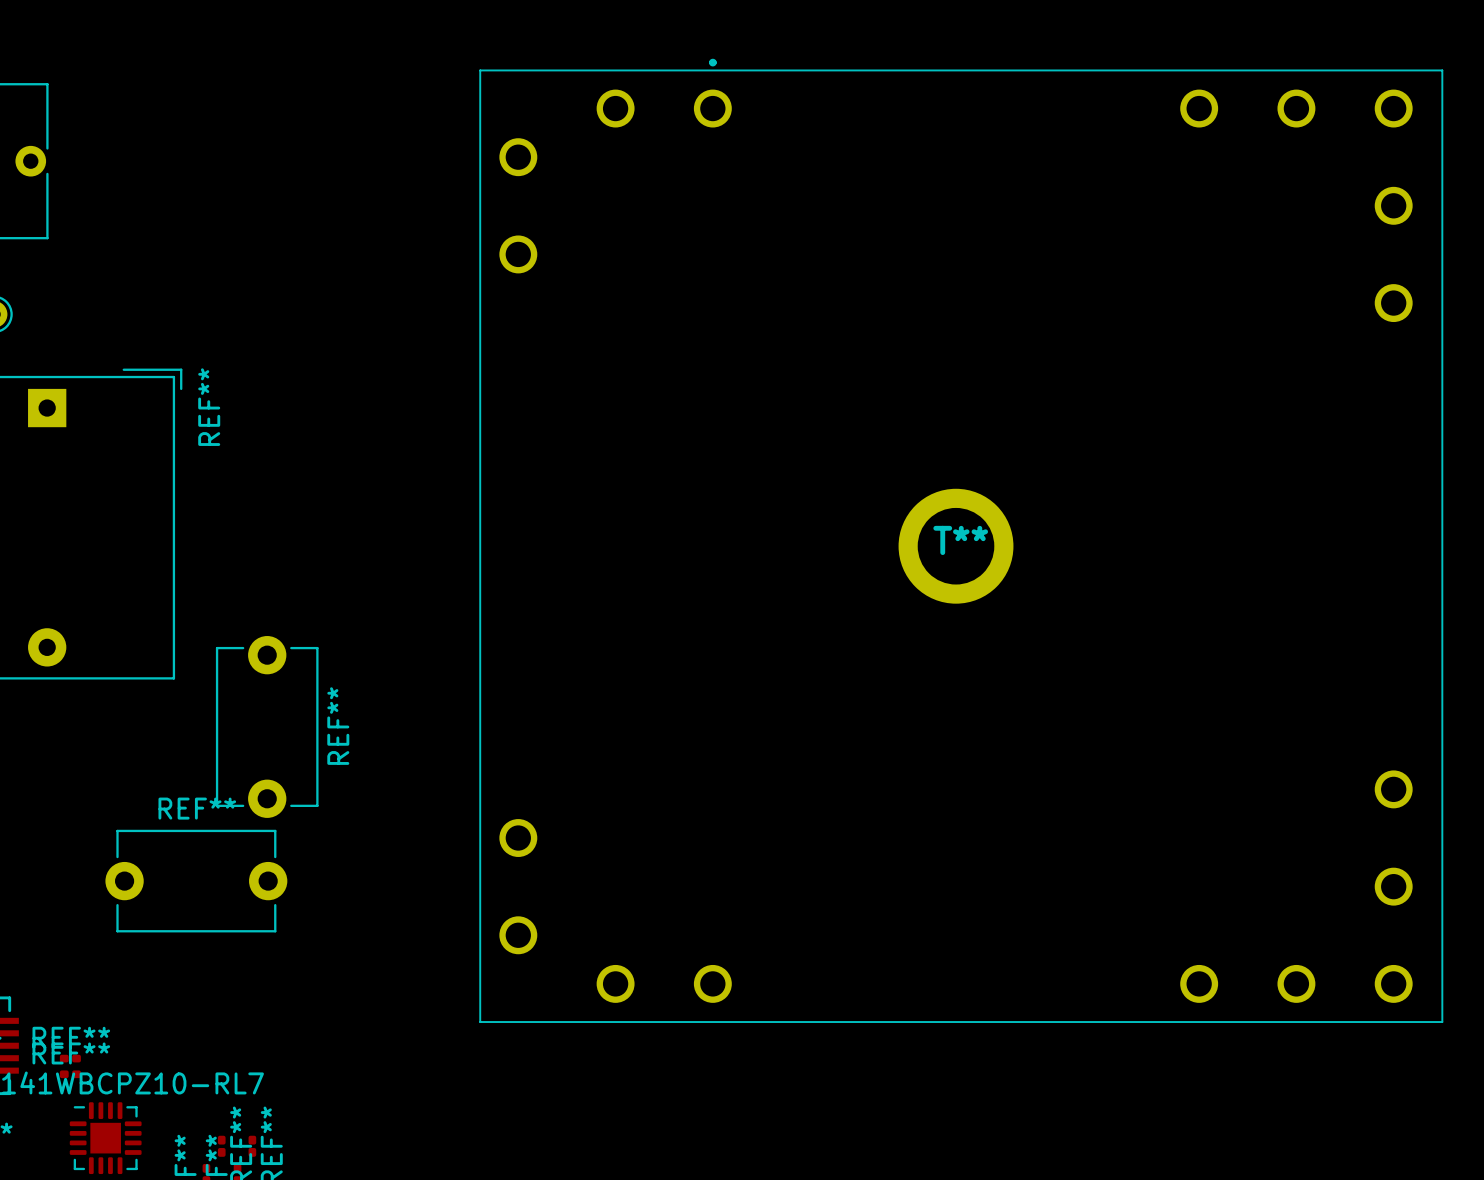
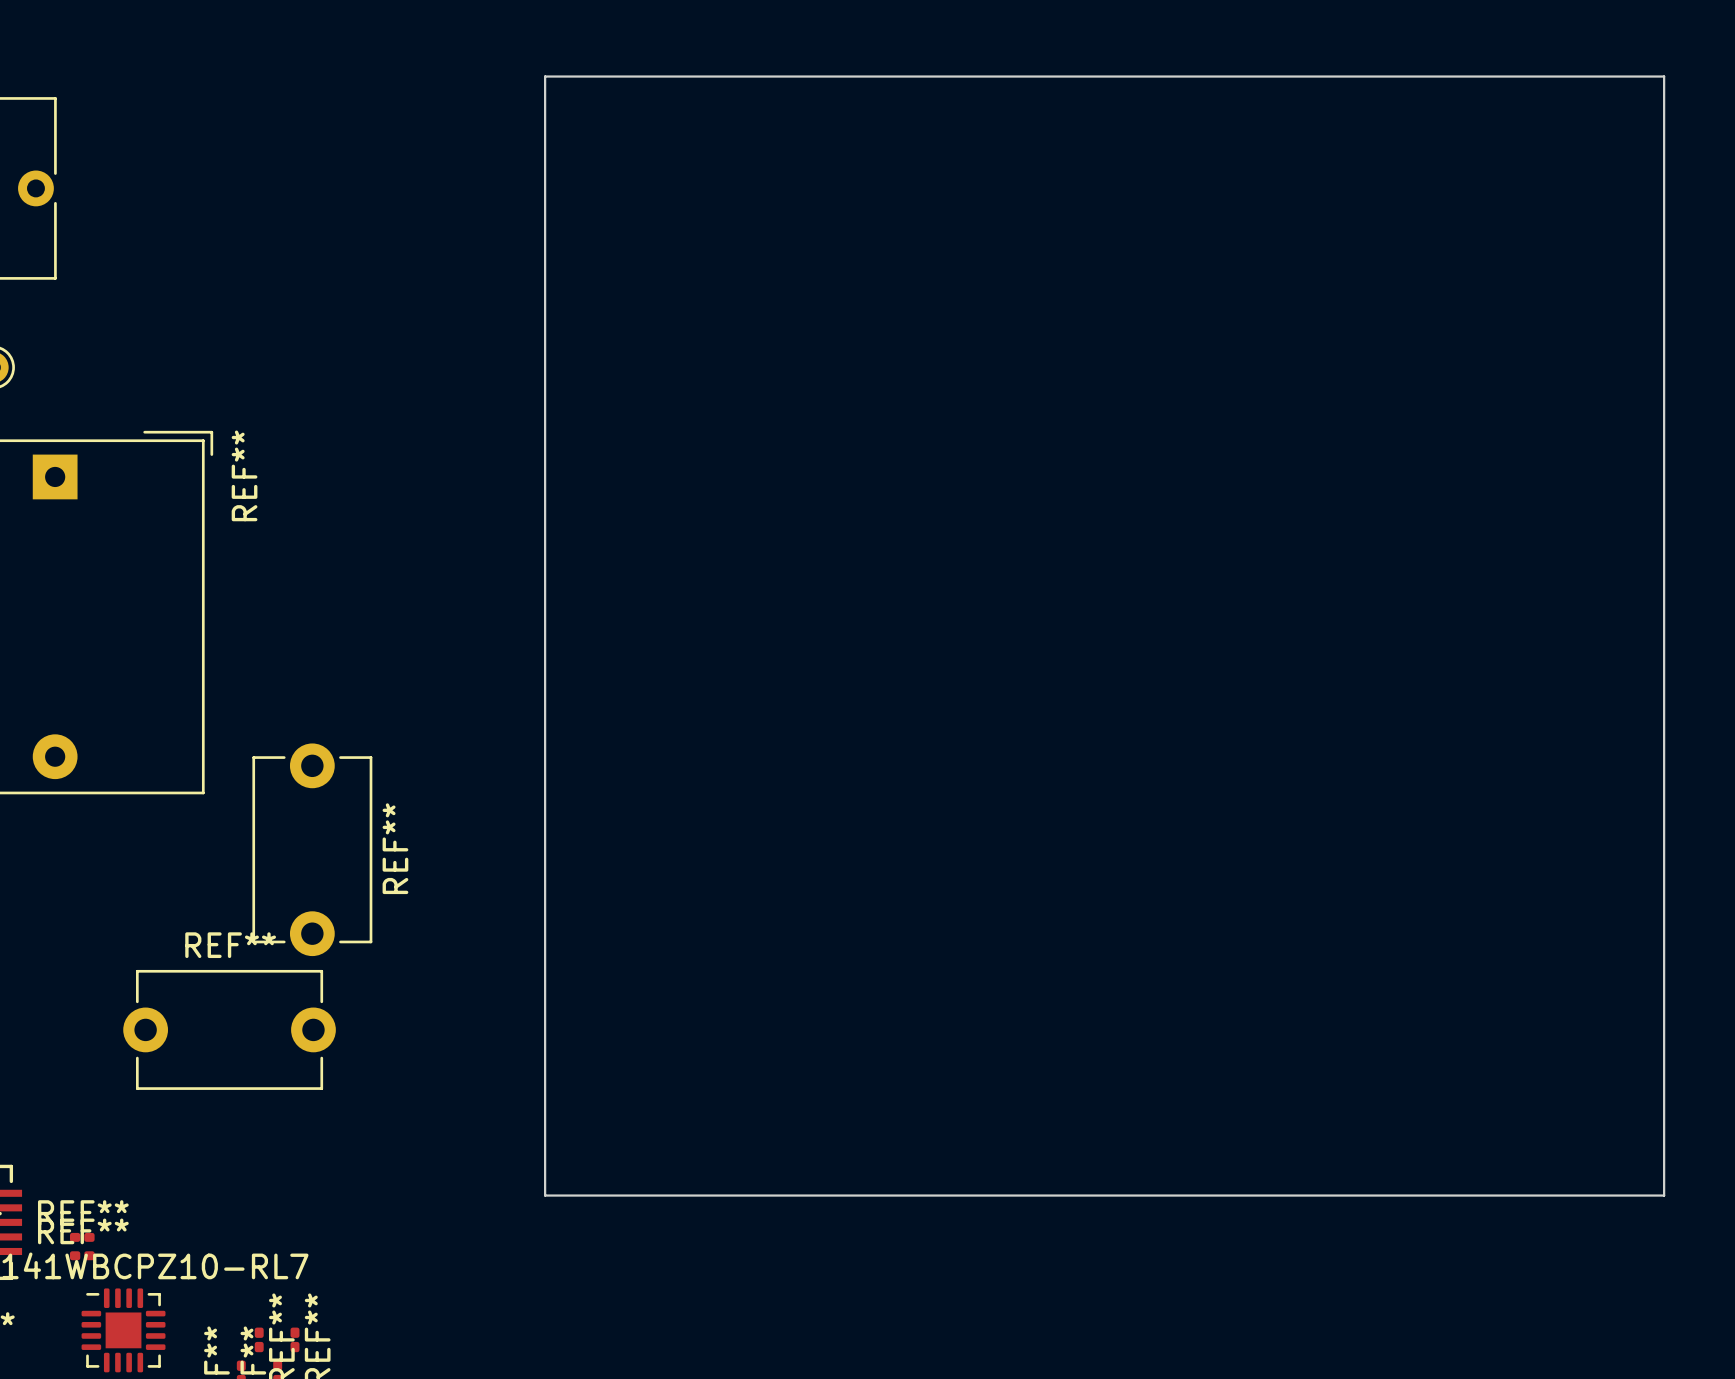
board edge: none -> (545, 76) (1664, 76) (1664, 1195) (545, 1195) (545, 76)
T**: (961, 540) -> none

